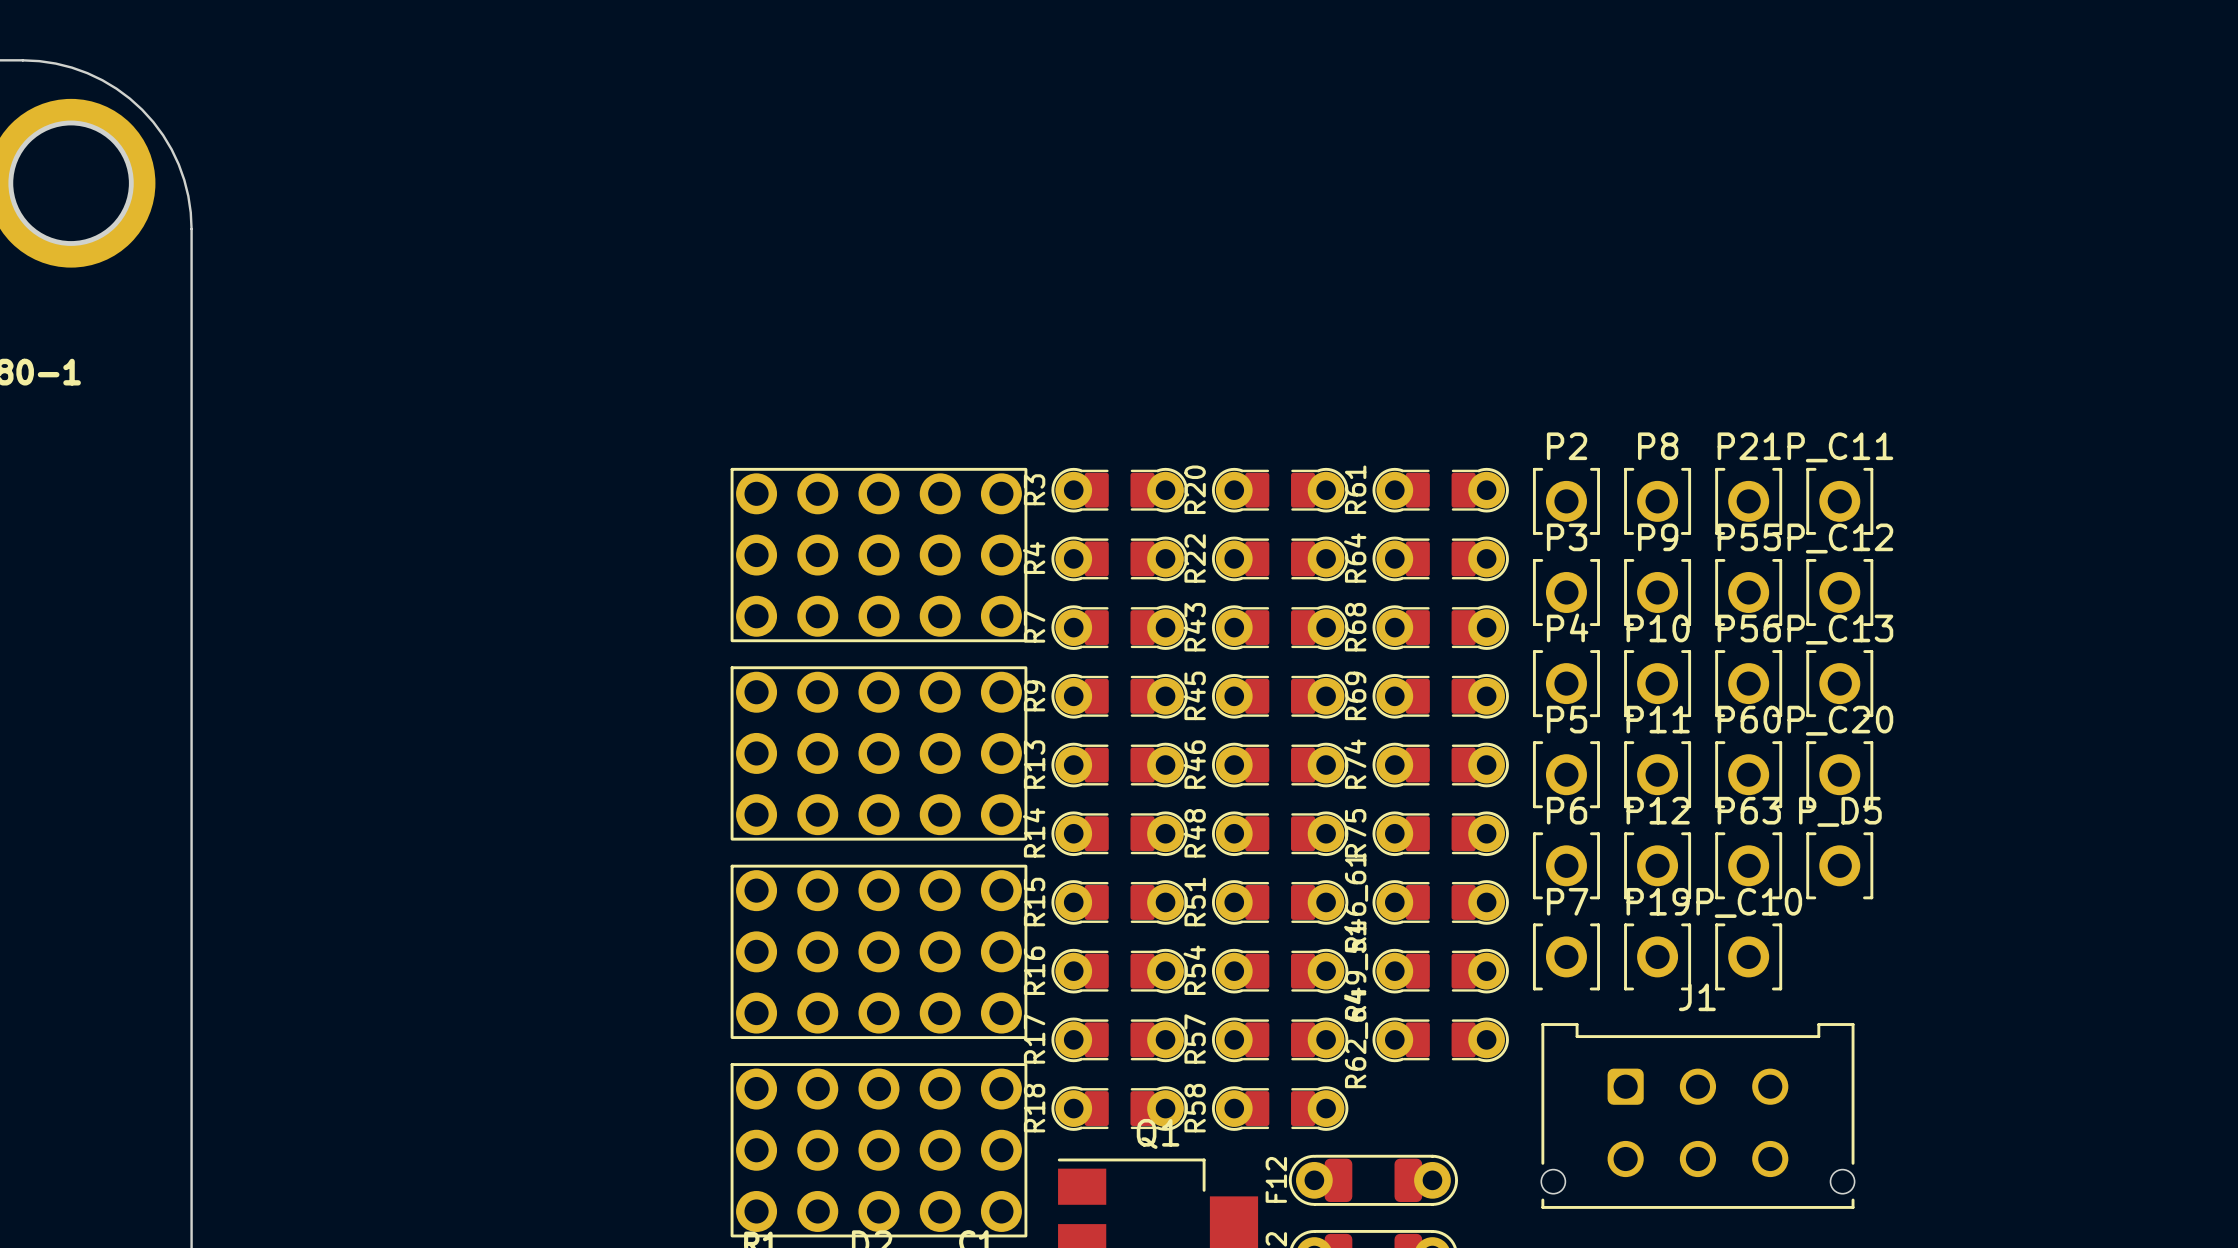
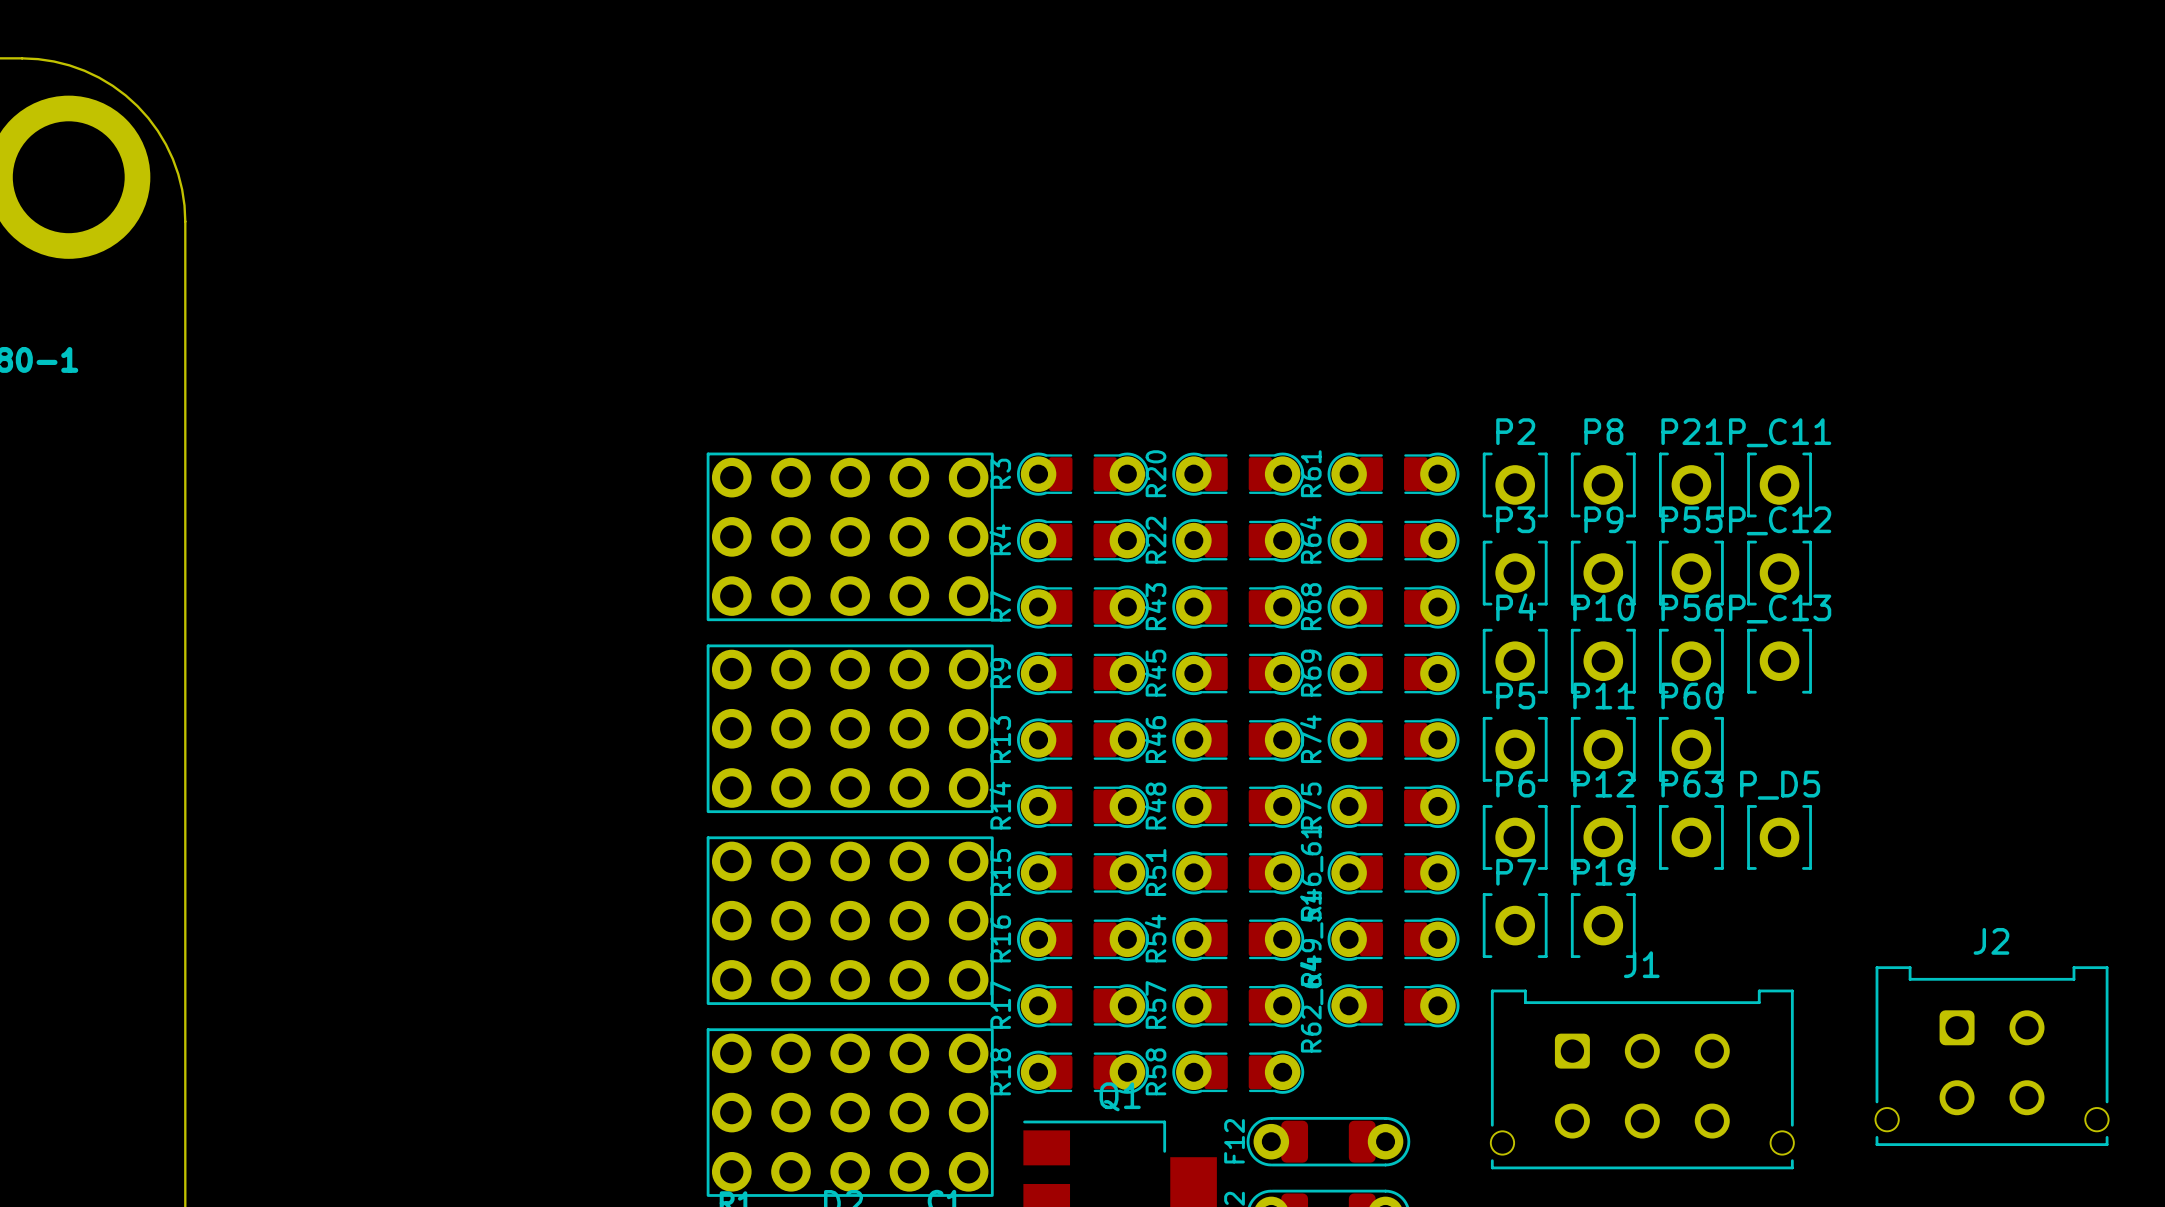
P_C20: (1839, 774) -> none
P_C10: (1748, 956) -> none
J2: none -> (1992, 1056)

